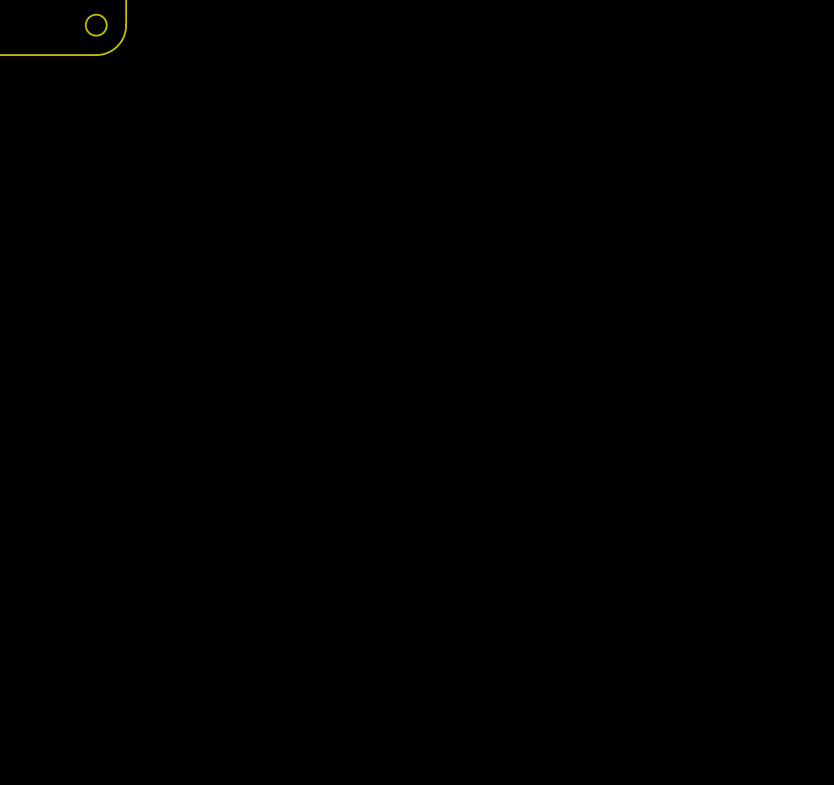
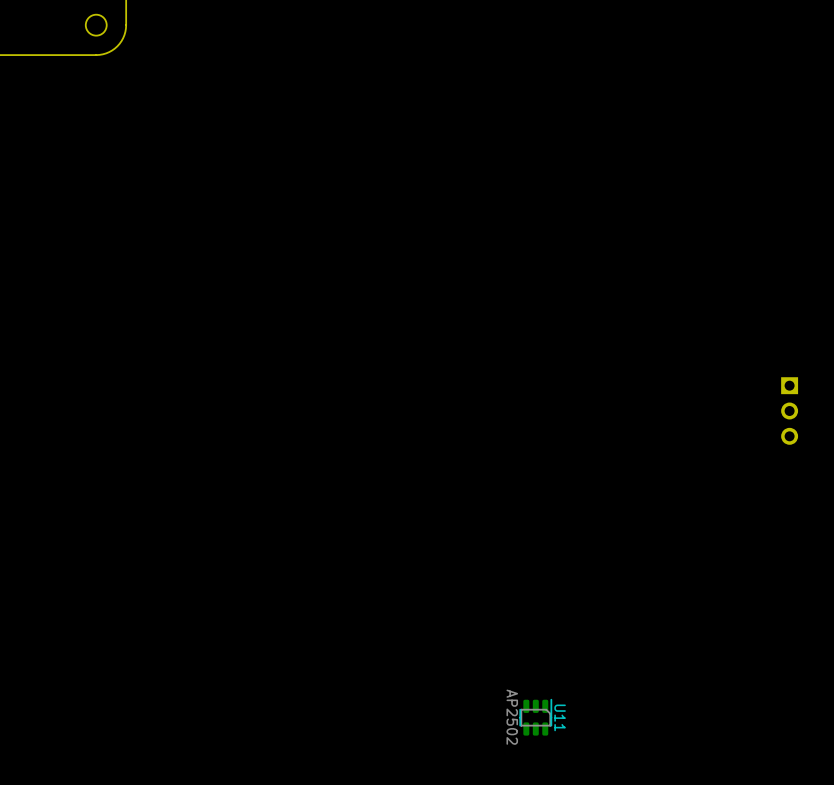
part: none -> (789, 411)
U11: none -> AP2502 (535, 717)

